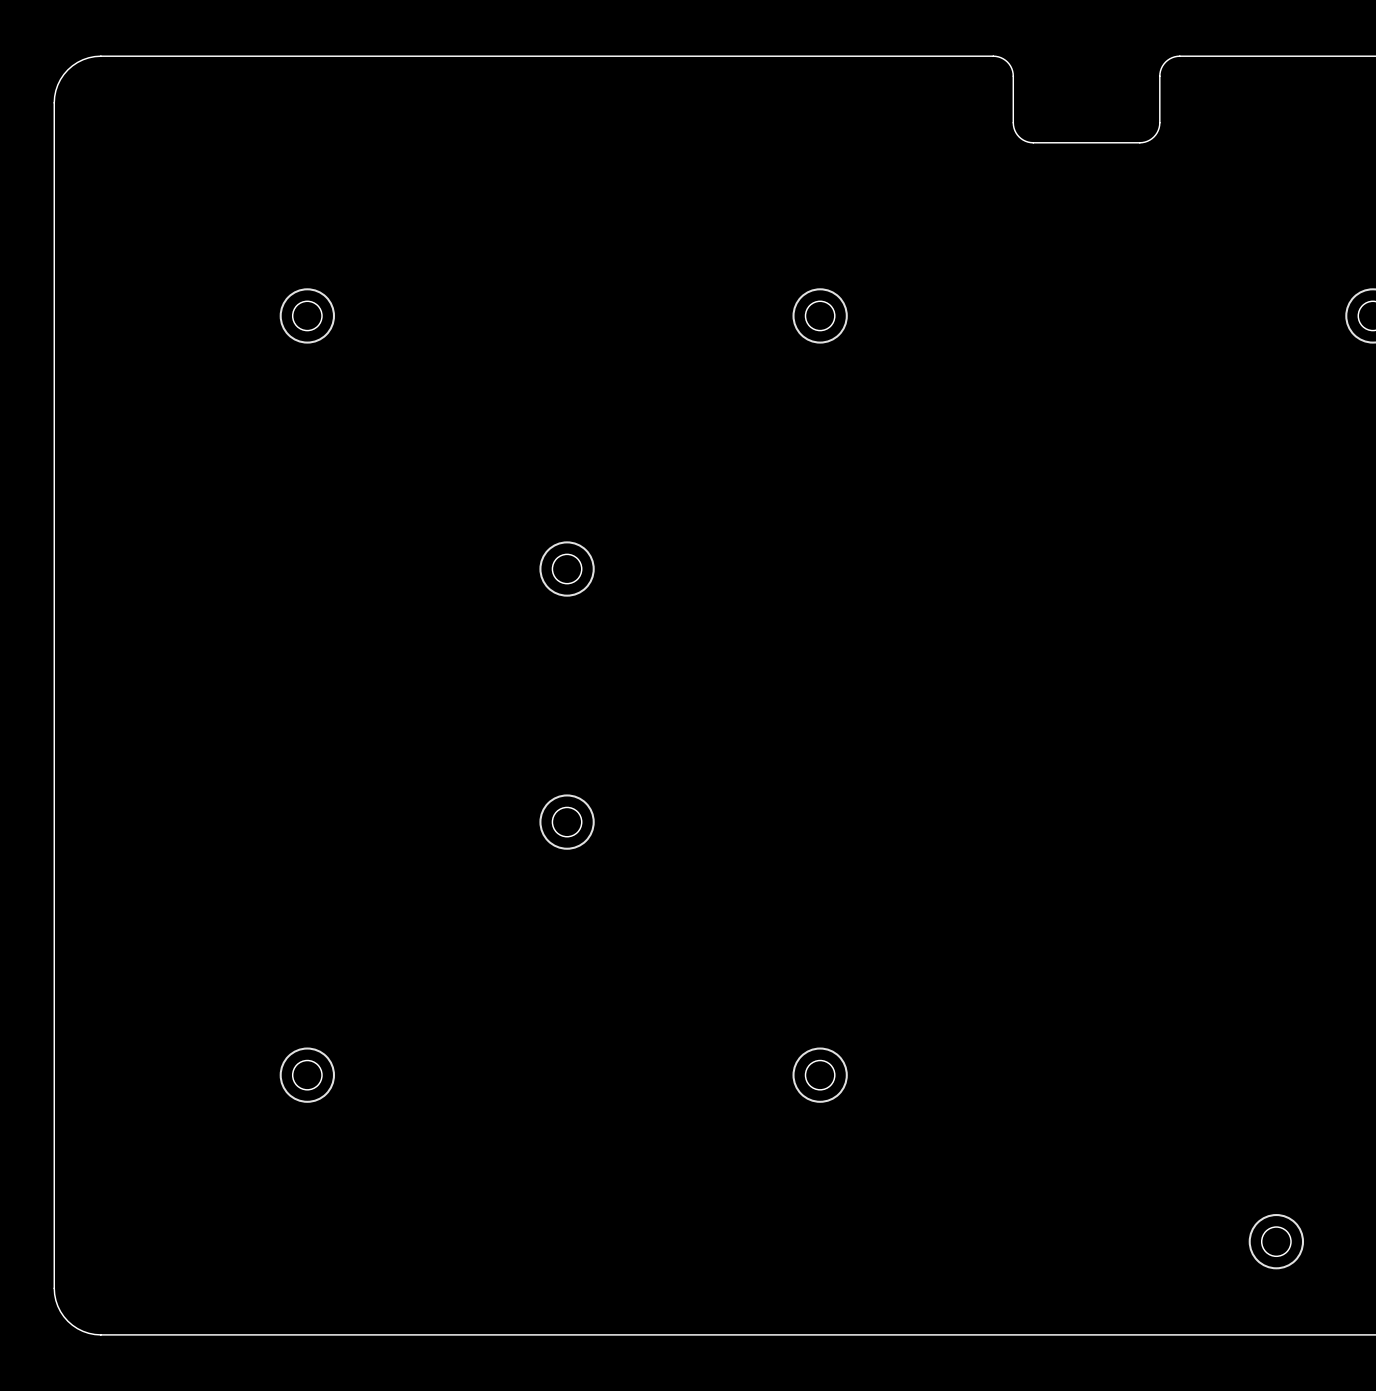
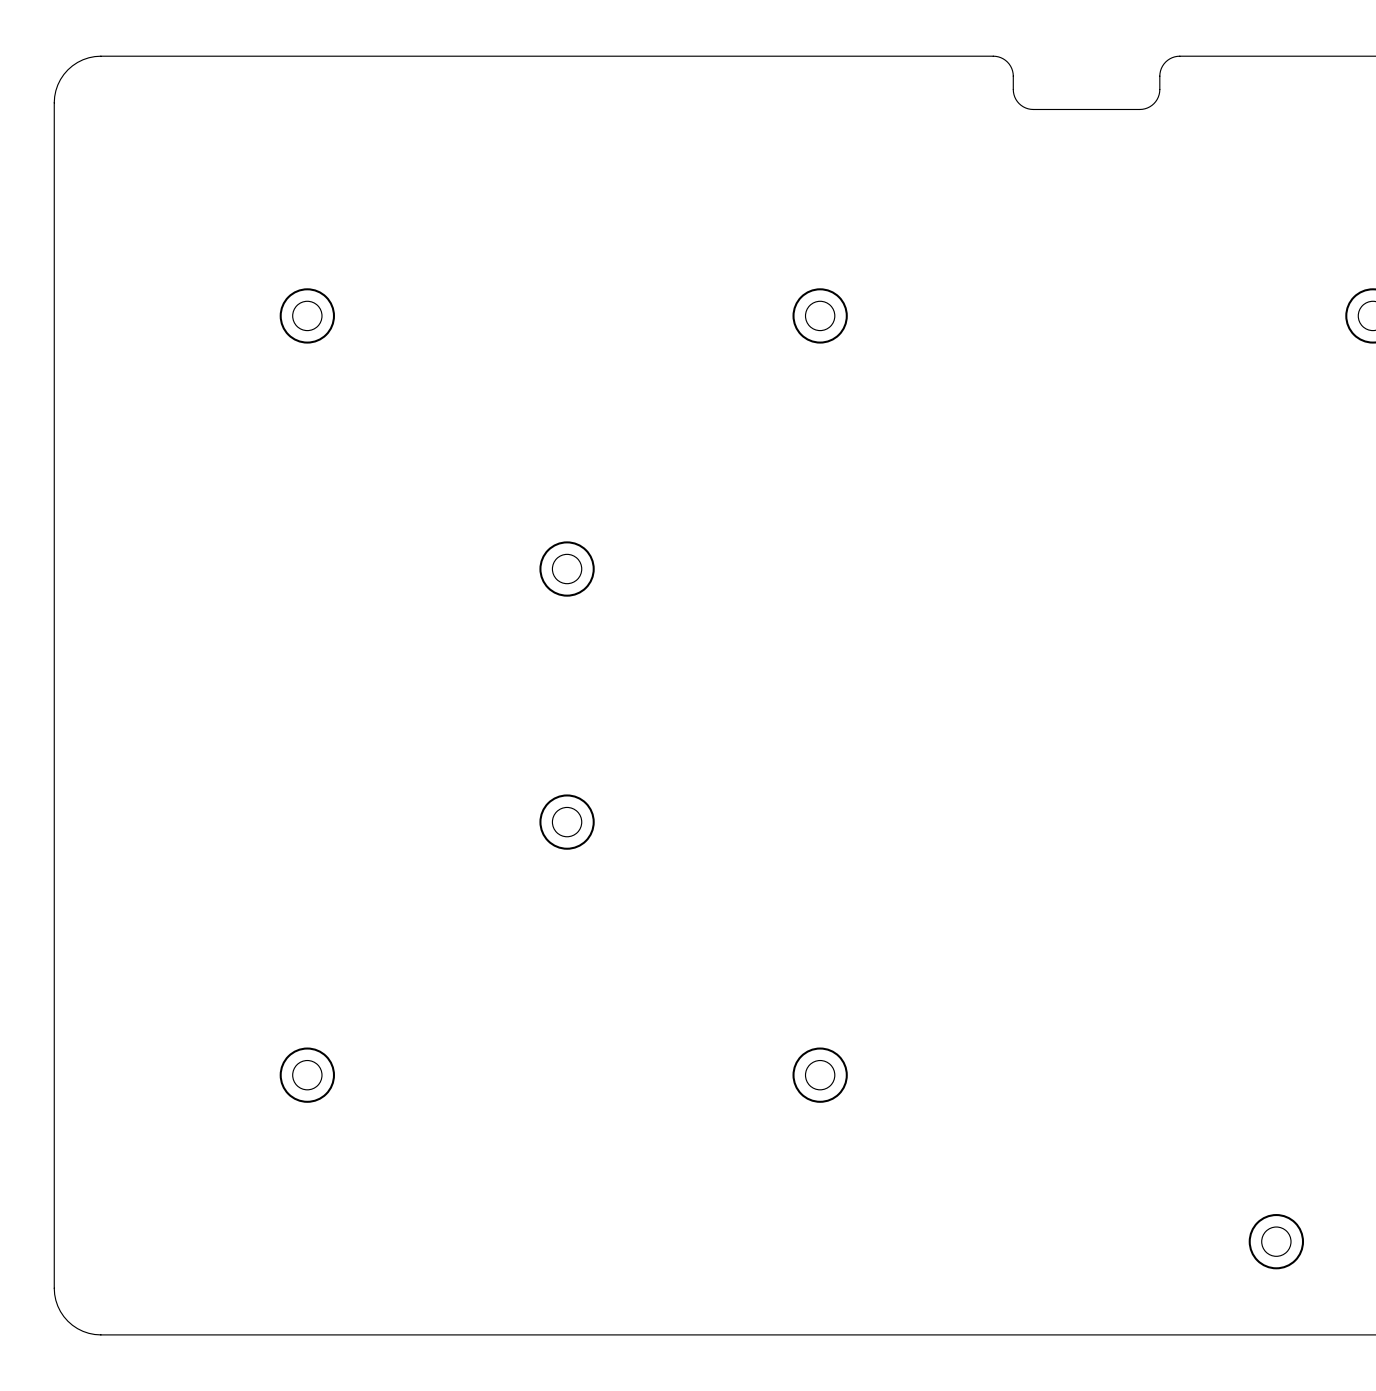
board edge: (1013, 89) (1014, 130) (1023, 140) (1033, 142) (1147, 141) (1153, 136) (1159, 127) (1159, 89) -> (1013, 89) (1014, 97) (1019, 103) (1025, 107) (1033, 109) (1142, 109) (1153, 103) (1158, 97) (1159, 89)

